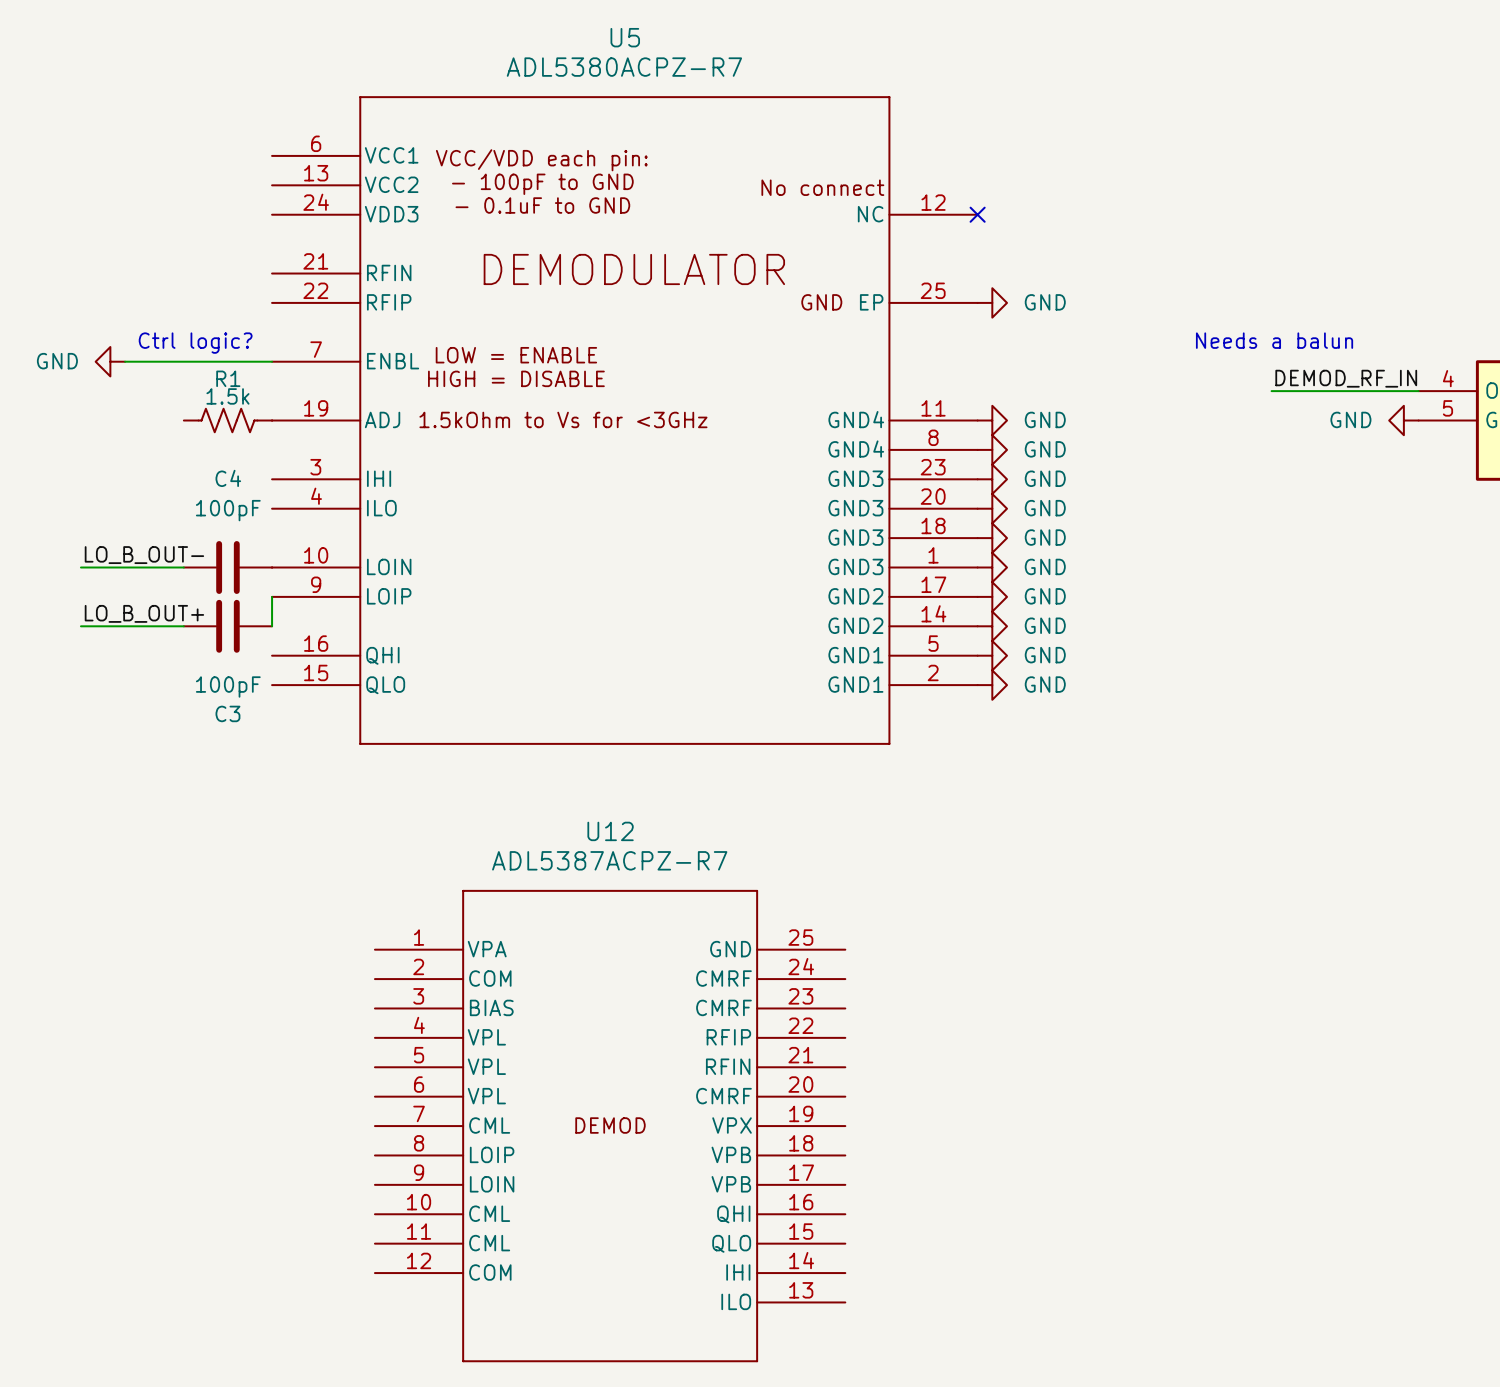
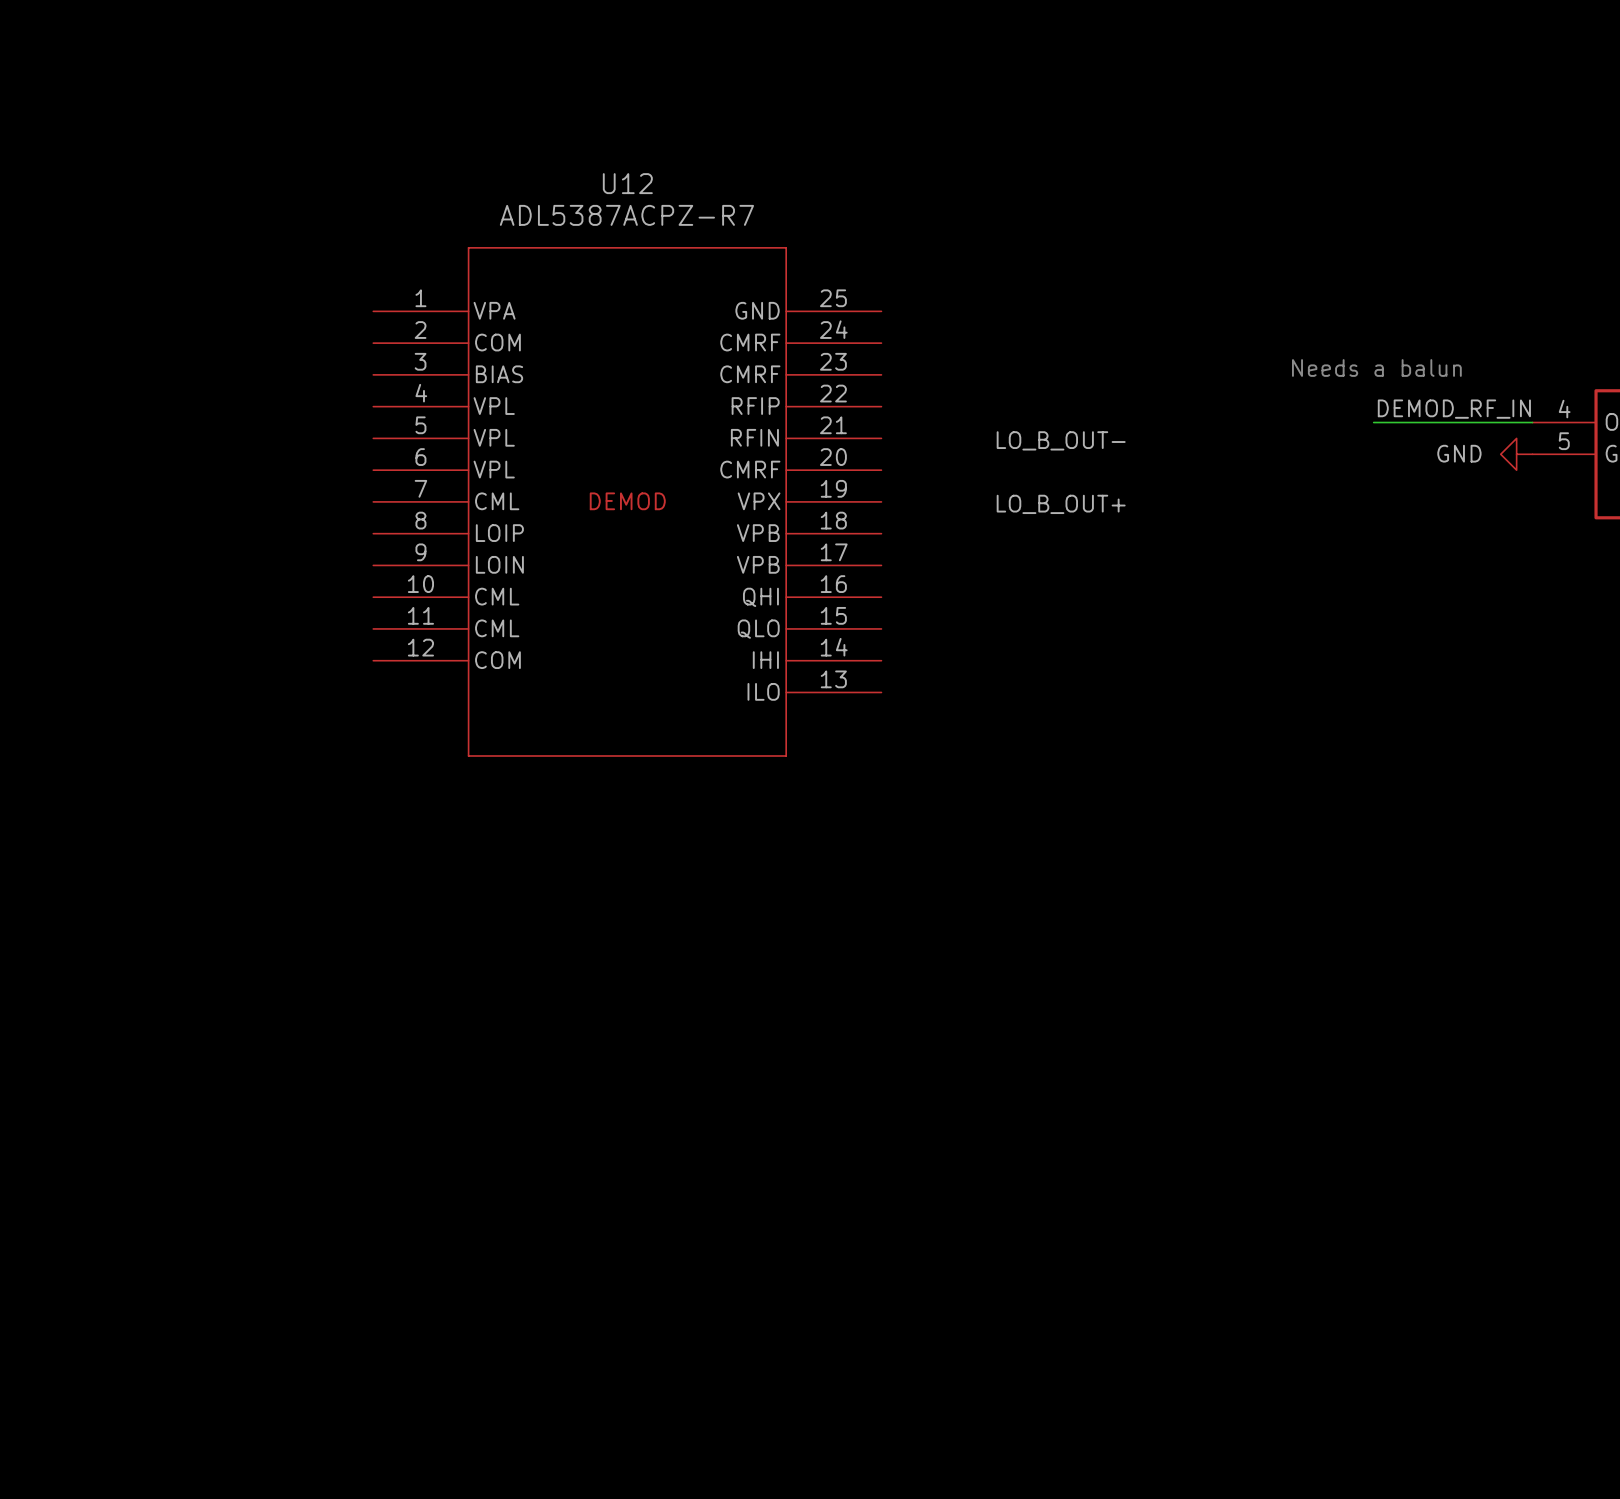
no-connect mark: (977, 214) -> none
power symbol: GND (992, 302) -> none
text: Ctrl logic? (195, 343) -> none
power symbol: GND (110, 361) -> none
wire: (125, 361) (272, 361) -> none
label: none -> LO_B_OUT- (1061, 440)
R1: 1.5k (227, 420) -> none
U5: ADL5380ACPZ-R7 (624, 420) -> none
power symbol: GND (992, 420) -> none
power symbol: GND (992, 449) -> none
label: none -> LO_B_OUT+ (1061, 504)
power symbol: GND (992, 479) -> none
power symbol: GND (992, 508) -> none
power symbol: GND (992, 538) -> none
label: LO_B_OUT- (144, 555) -> none
wire: (80, 567) (183, 567) -> none
C4: 100pF (227, 567) -> none
power symbol: GND (992, 567) -> none
wire: (272, 596) (272, 626) -> none
power symbol: GND (992, 596) -> none
label: LO_B_OUT+ (144, 613) -> none
wire: (80, 626) (183, 626) -> none
C3: 100pF (227, 626) -> none
power symbol: GND (992, 626) -> none
power symbol: GND (992, 655) -> none
power symbol: GND (992, 685) -> none
U12 position: (610, 1126) -> (627, 501)

